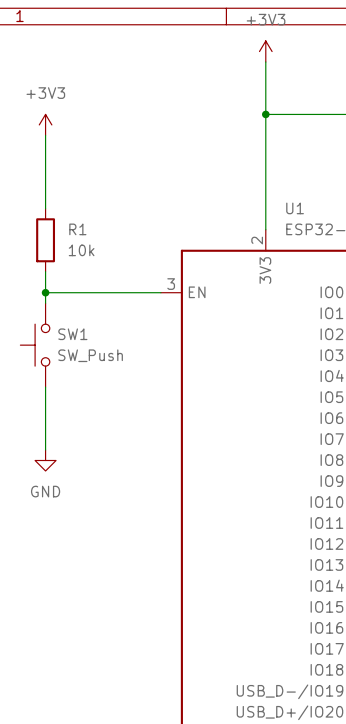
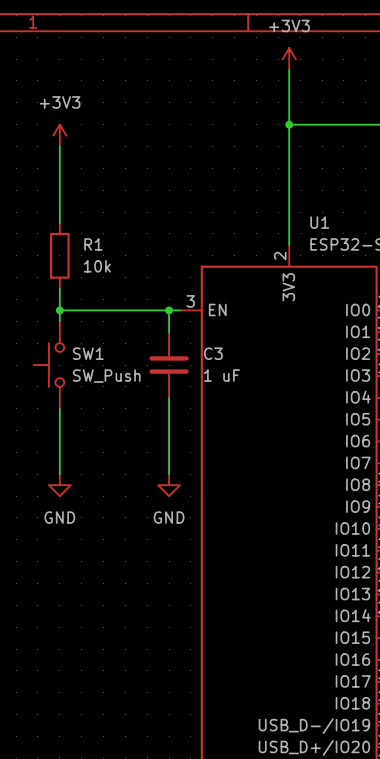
wire: none -> (169, 310) (169, 332)
junction: none -> (169, 310)
C3: none -> 1 uF (169, 365)
wire: none -> (169, 397) (169, 474)
power symbol: none -> GND (169, 485)

